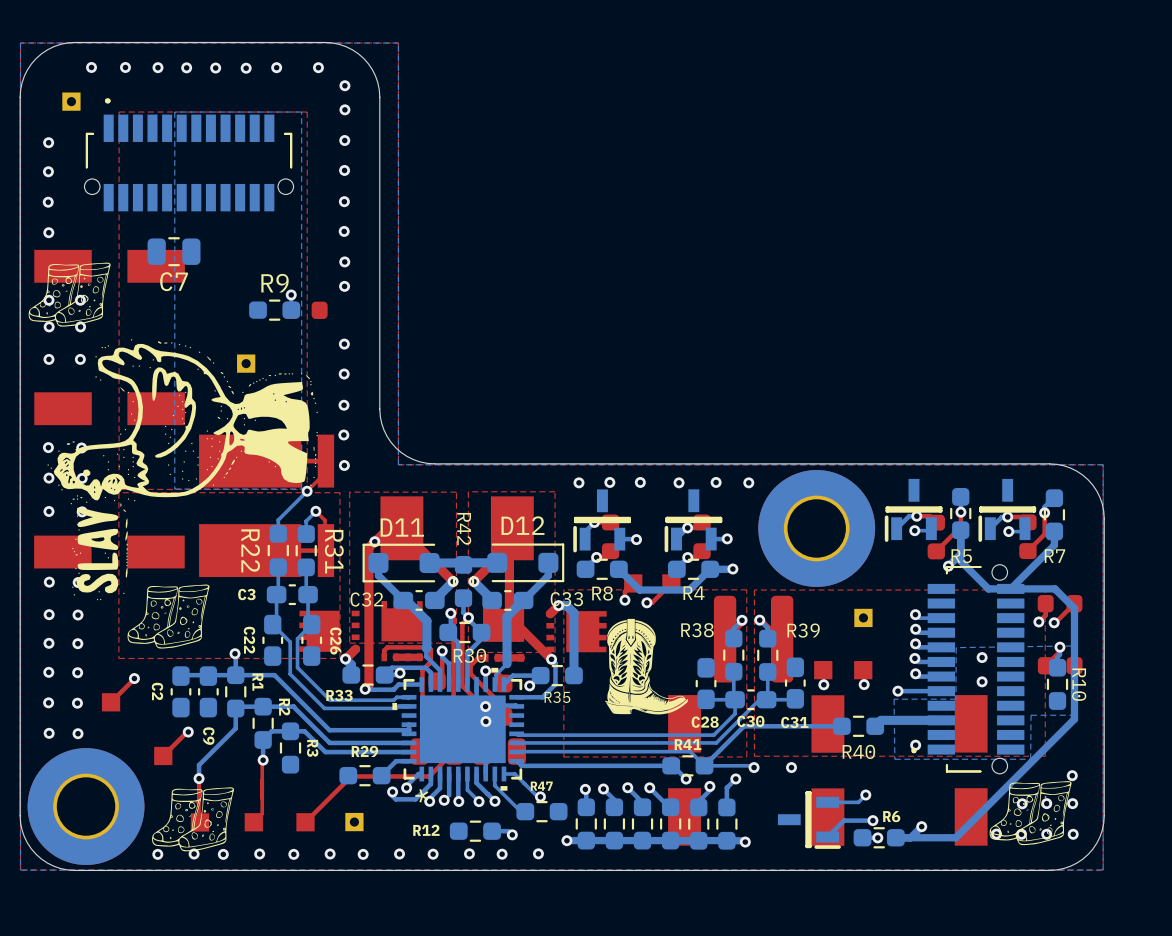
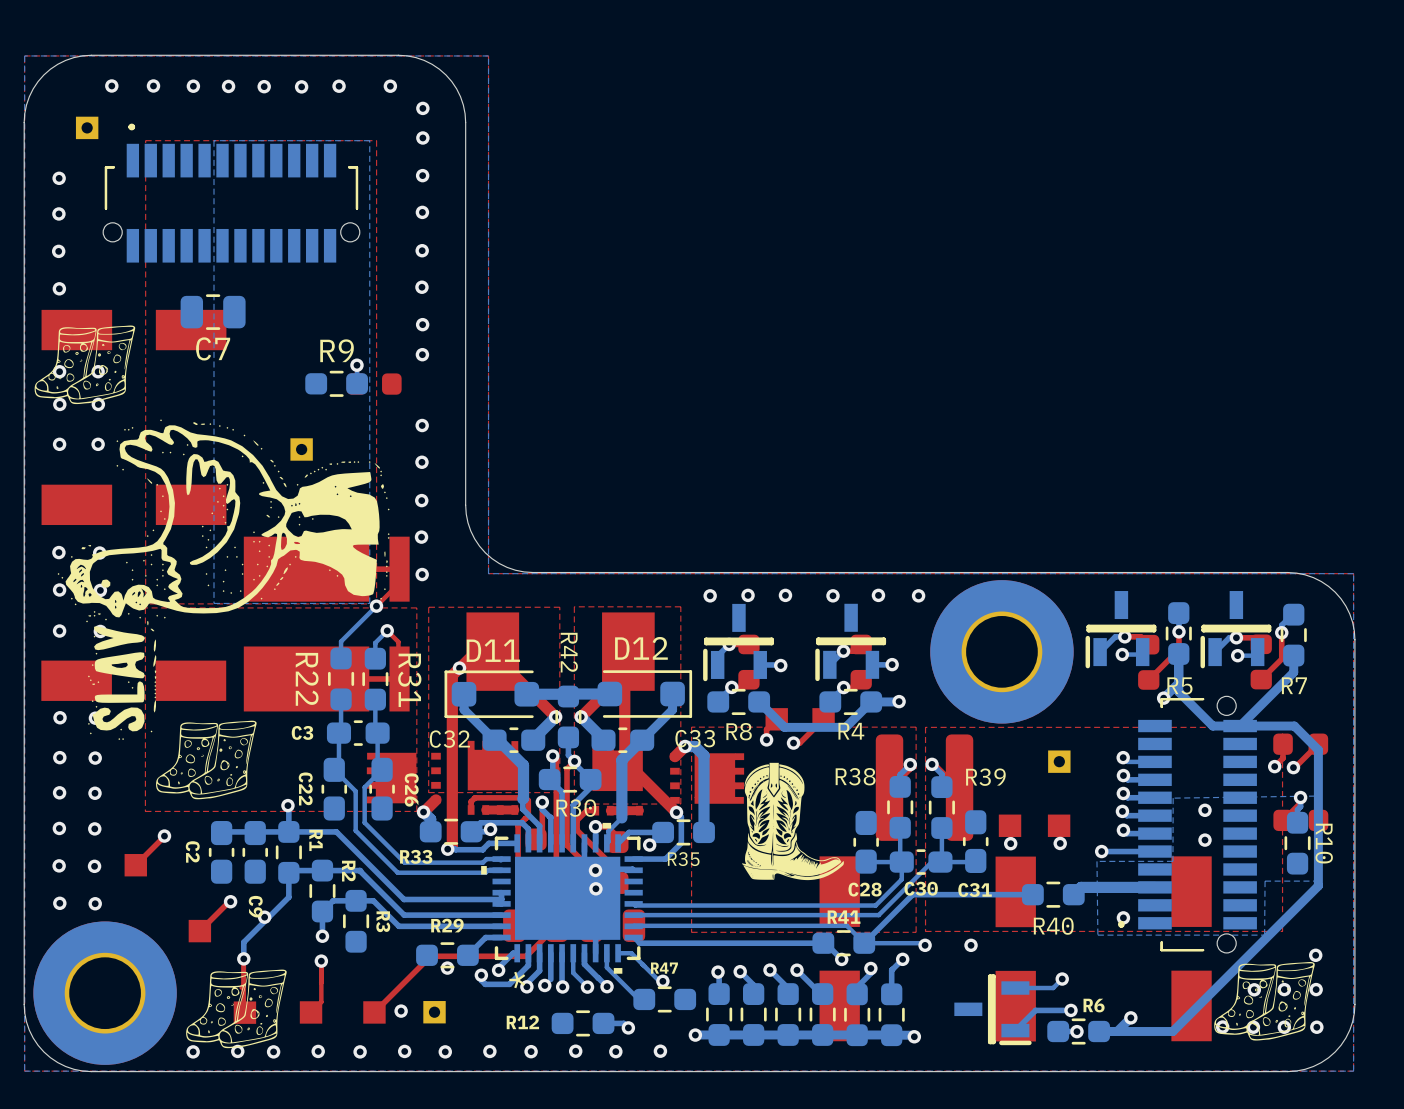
via: none -> (264, 917)
top track: (263, 760) (262, 780) -> none
via: none -> (321, 961)
via: none -> (447, 968)
via: none -> (401, 1011)

